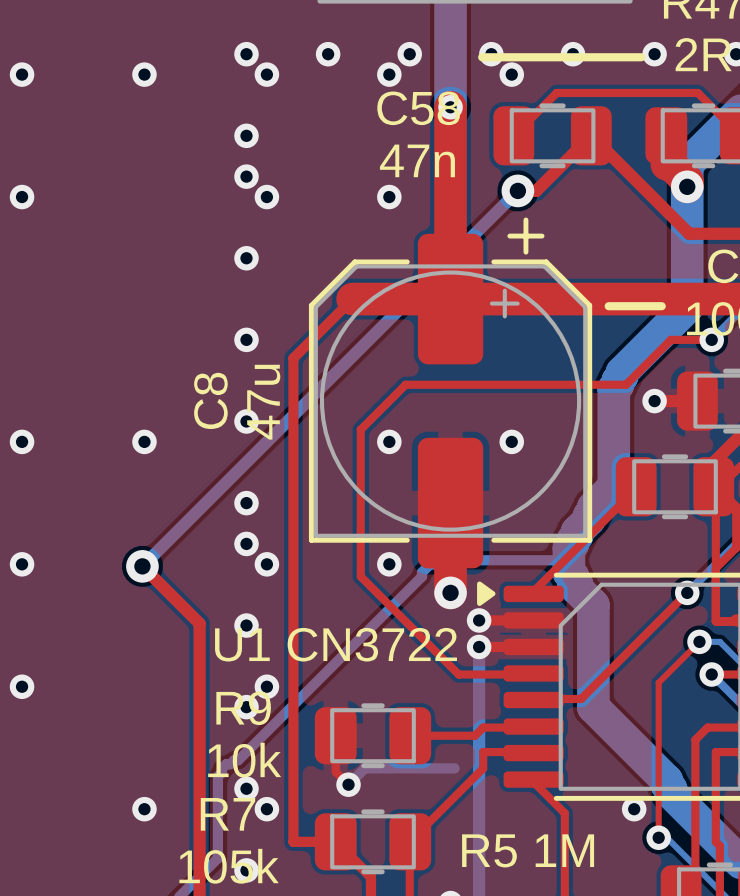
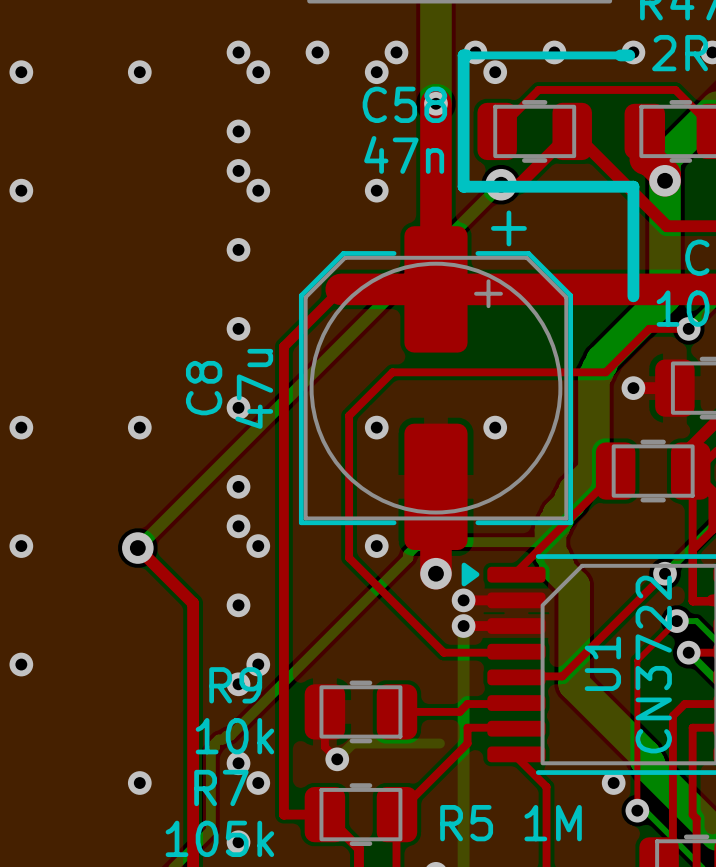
line: none -> (466, 55) (463, 55) (463, 186) (633, 186) (633, 296)
line: none -> (620, 55) (629, 55)
line: (608, 306) (661, 306) -> none
text: U1 CN3722 (336, 644) -> none
text: none -> U1 (602, 663)
text: none -> CN3722 (653, 664)

